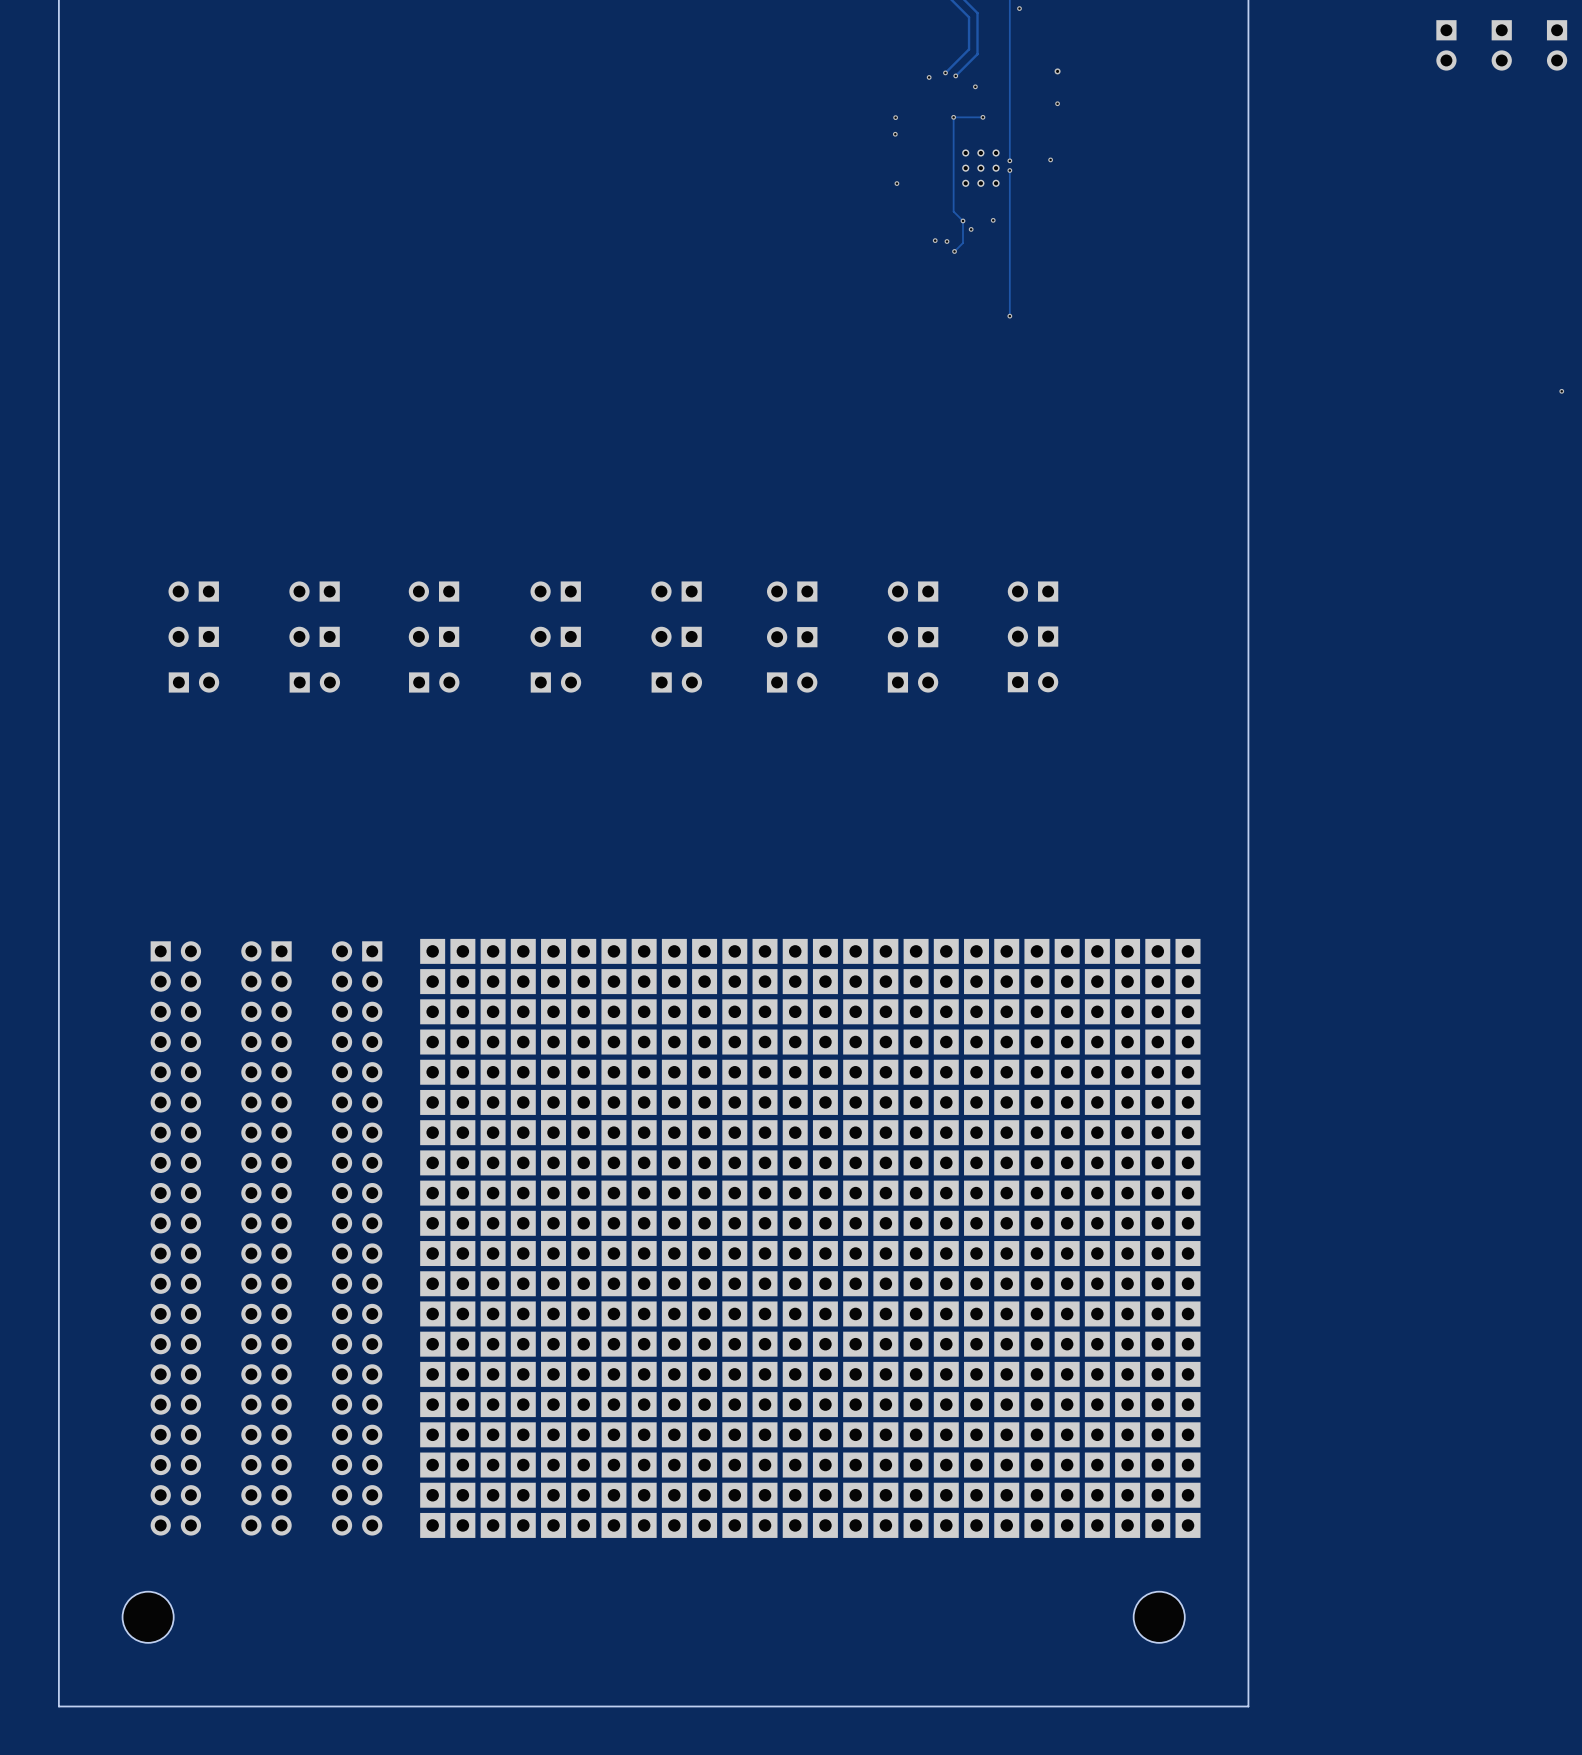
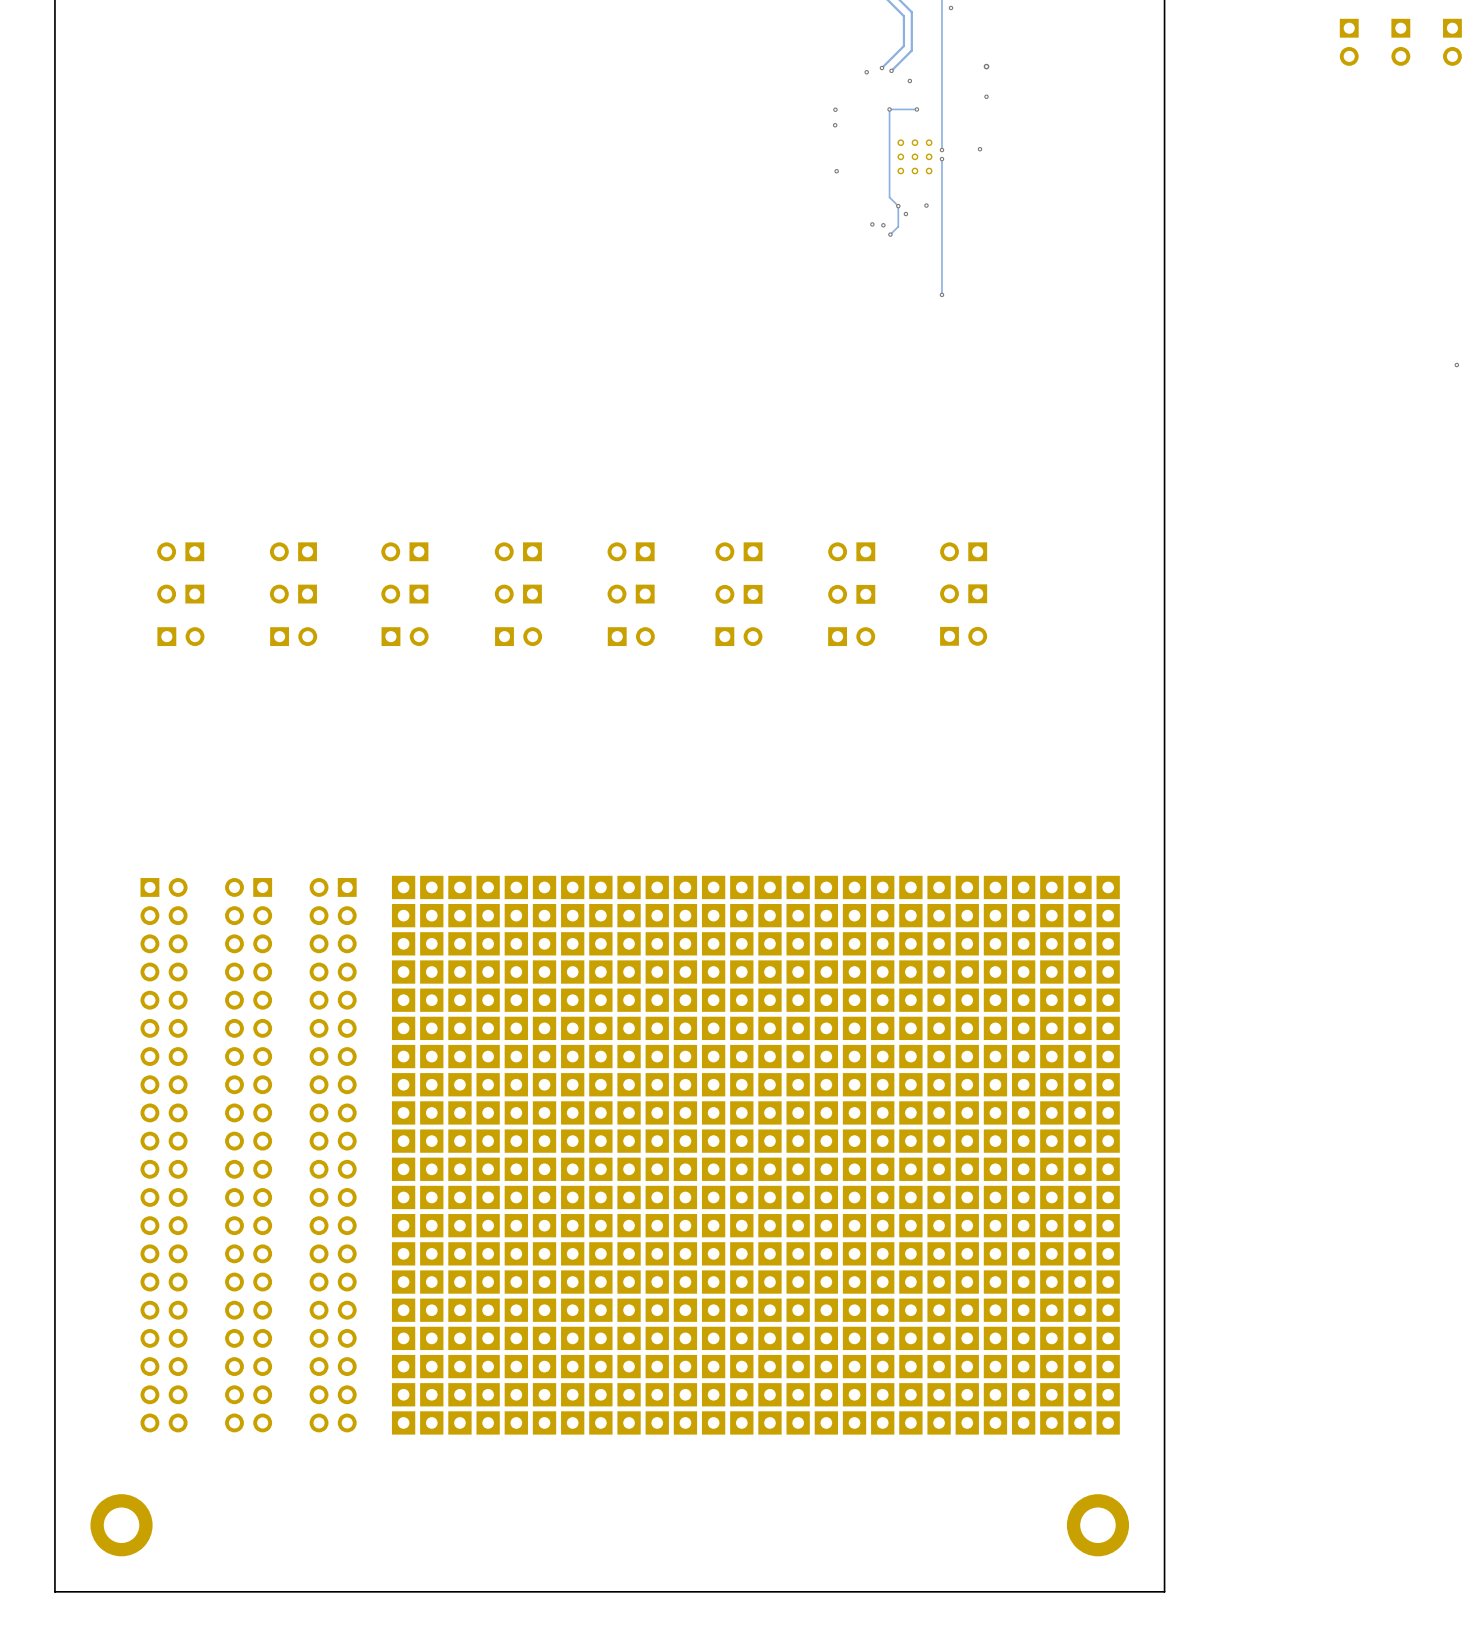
part: (148, 1617) -> none
part: (1159, 1617) -> none
part: none -> (121, 1525)
part: none -> (1097, 1525)

